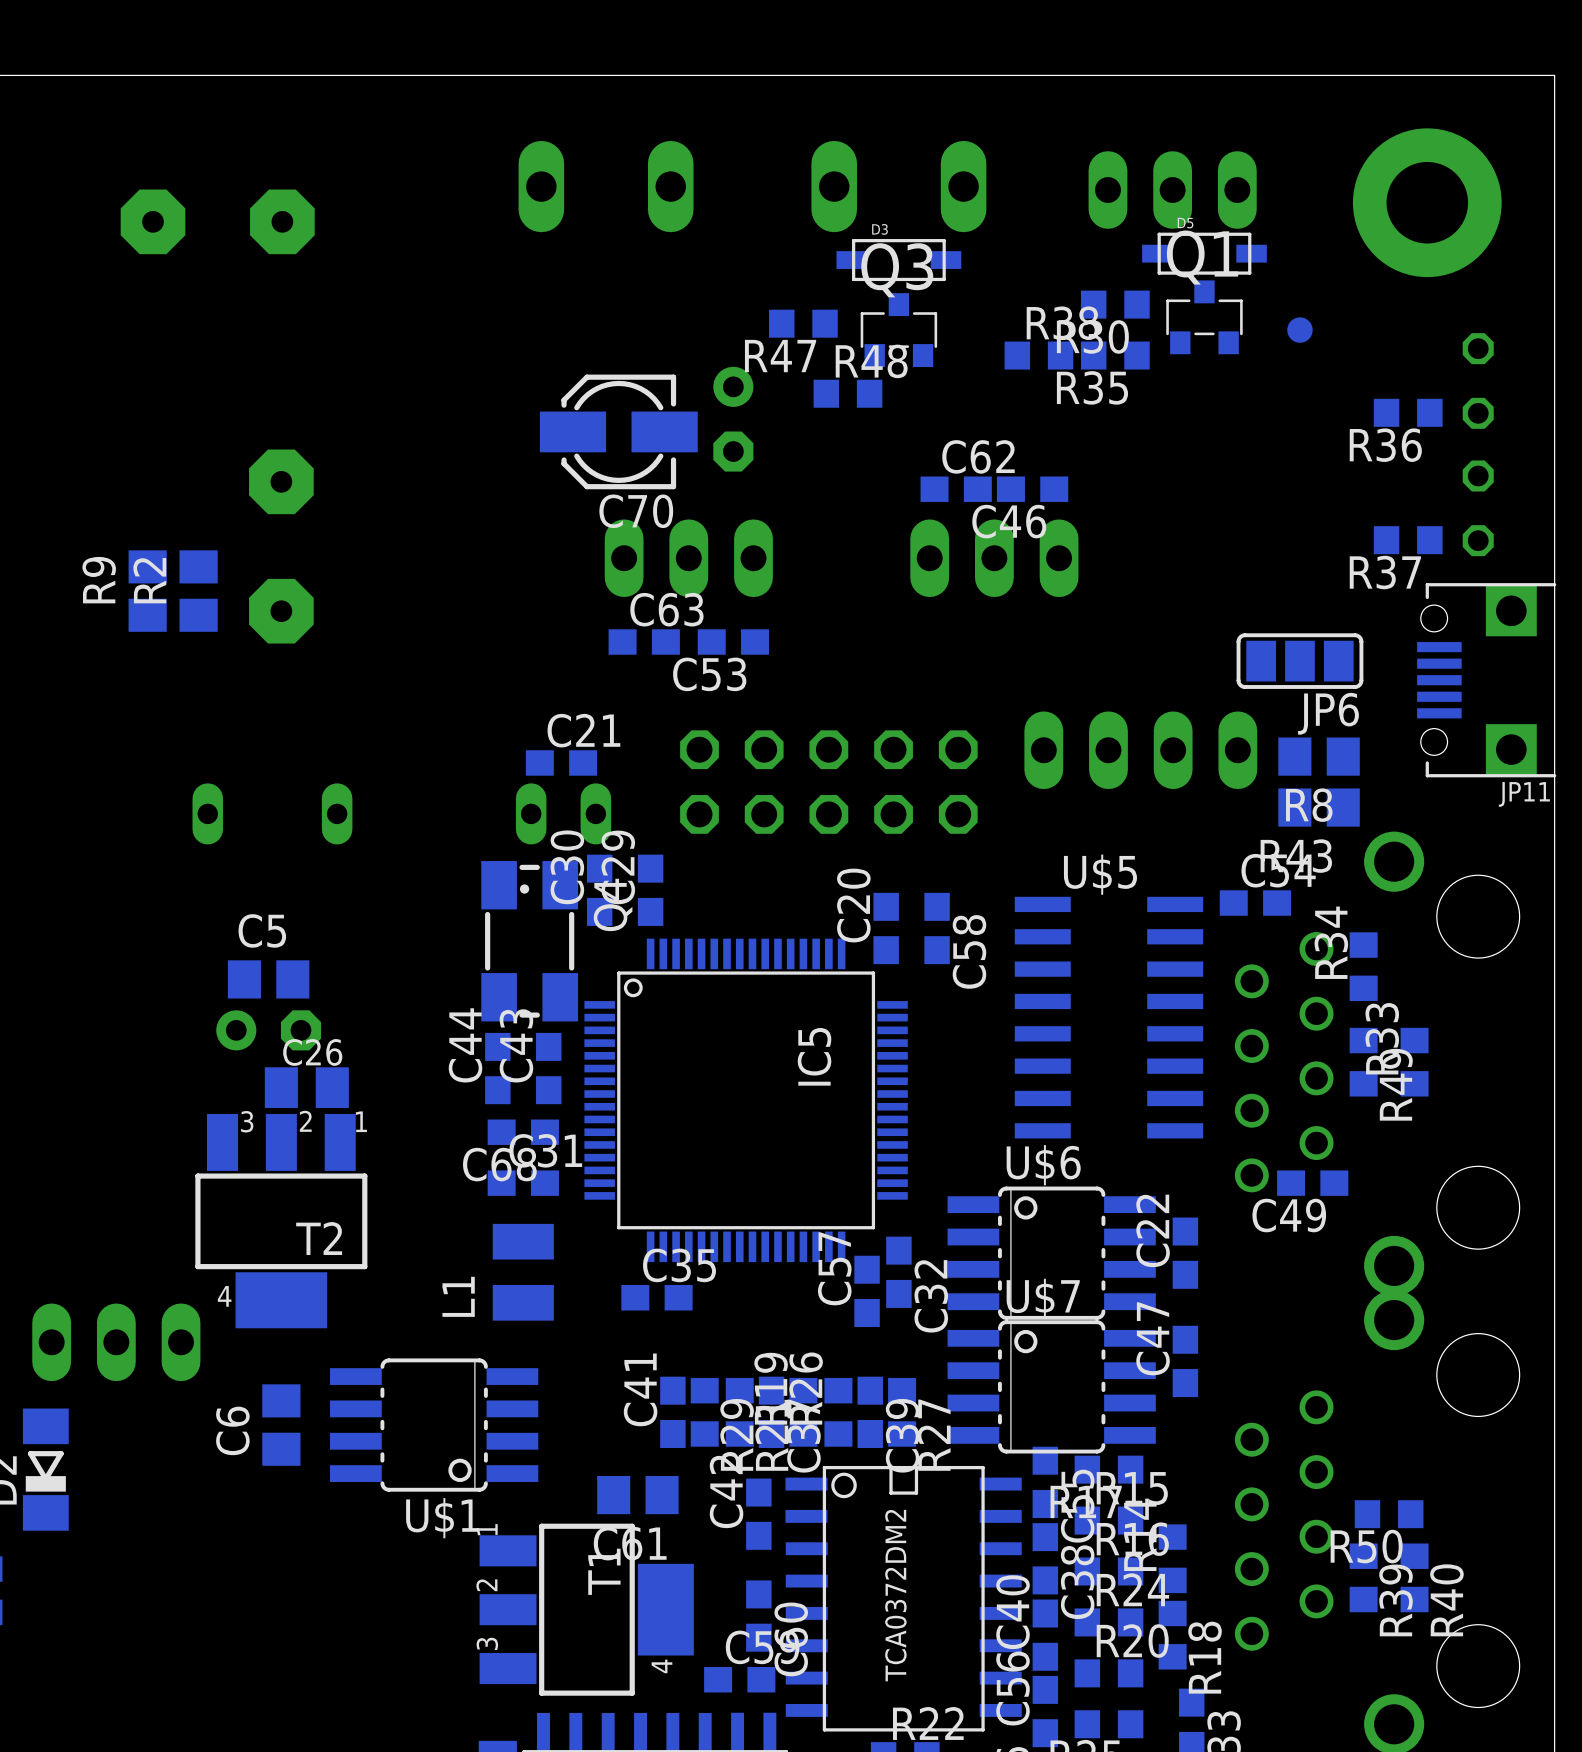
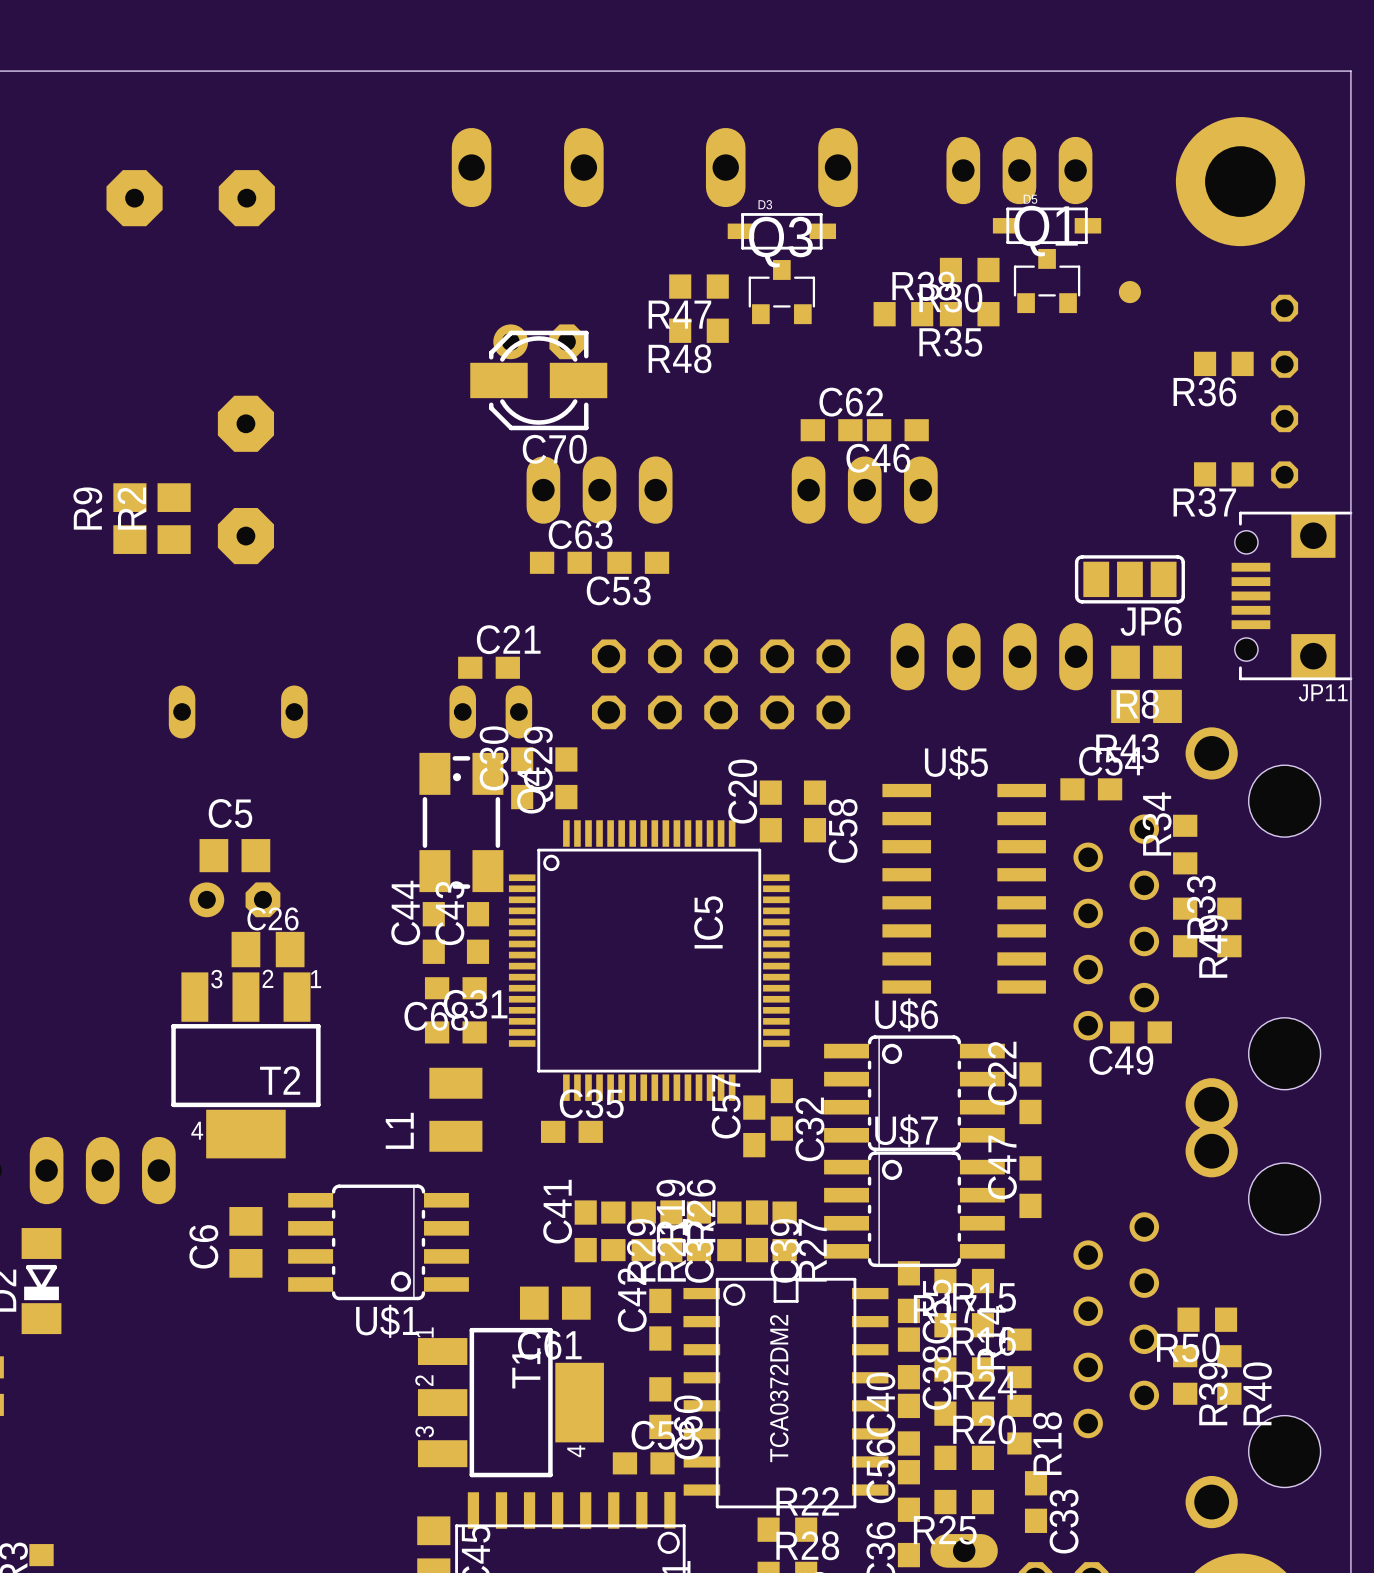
R48 name position: R48 (871, 361) -> R48 (680, 358)
R48 position: (847, 393) -> (698, 330)
part rotation: 0° (733, 419) -> 90° counterclockwise (538, 341)
part position: (733, 419) -> (538, 341)

